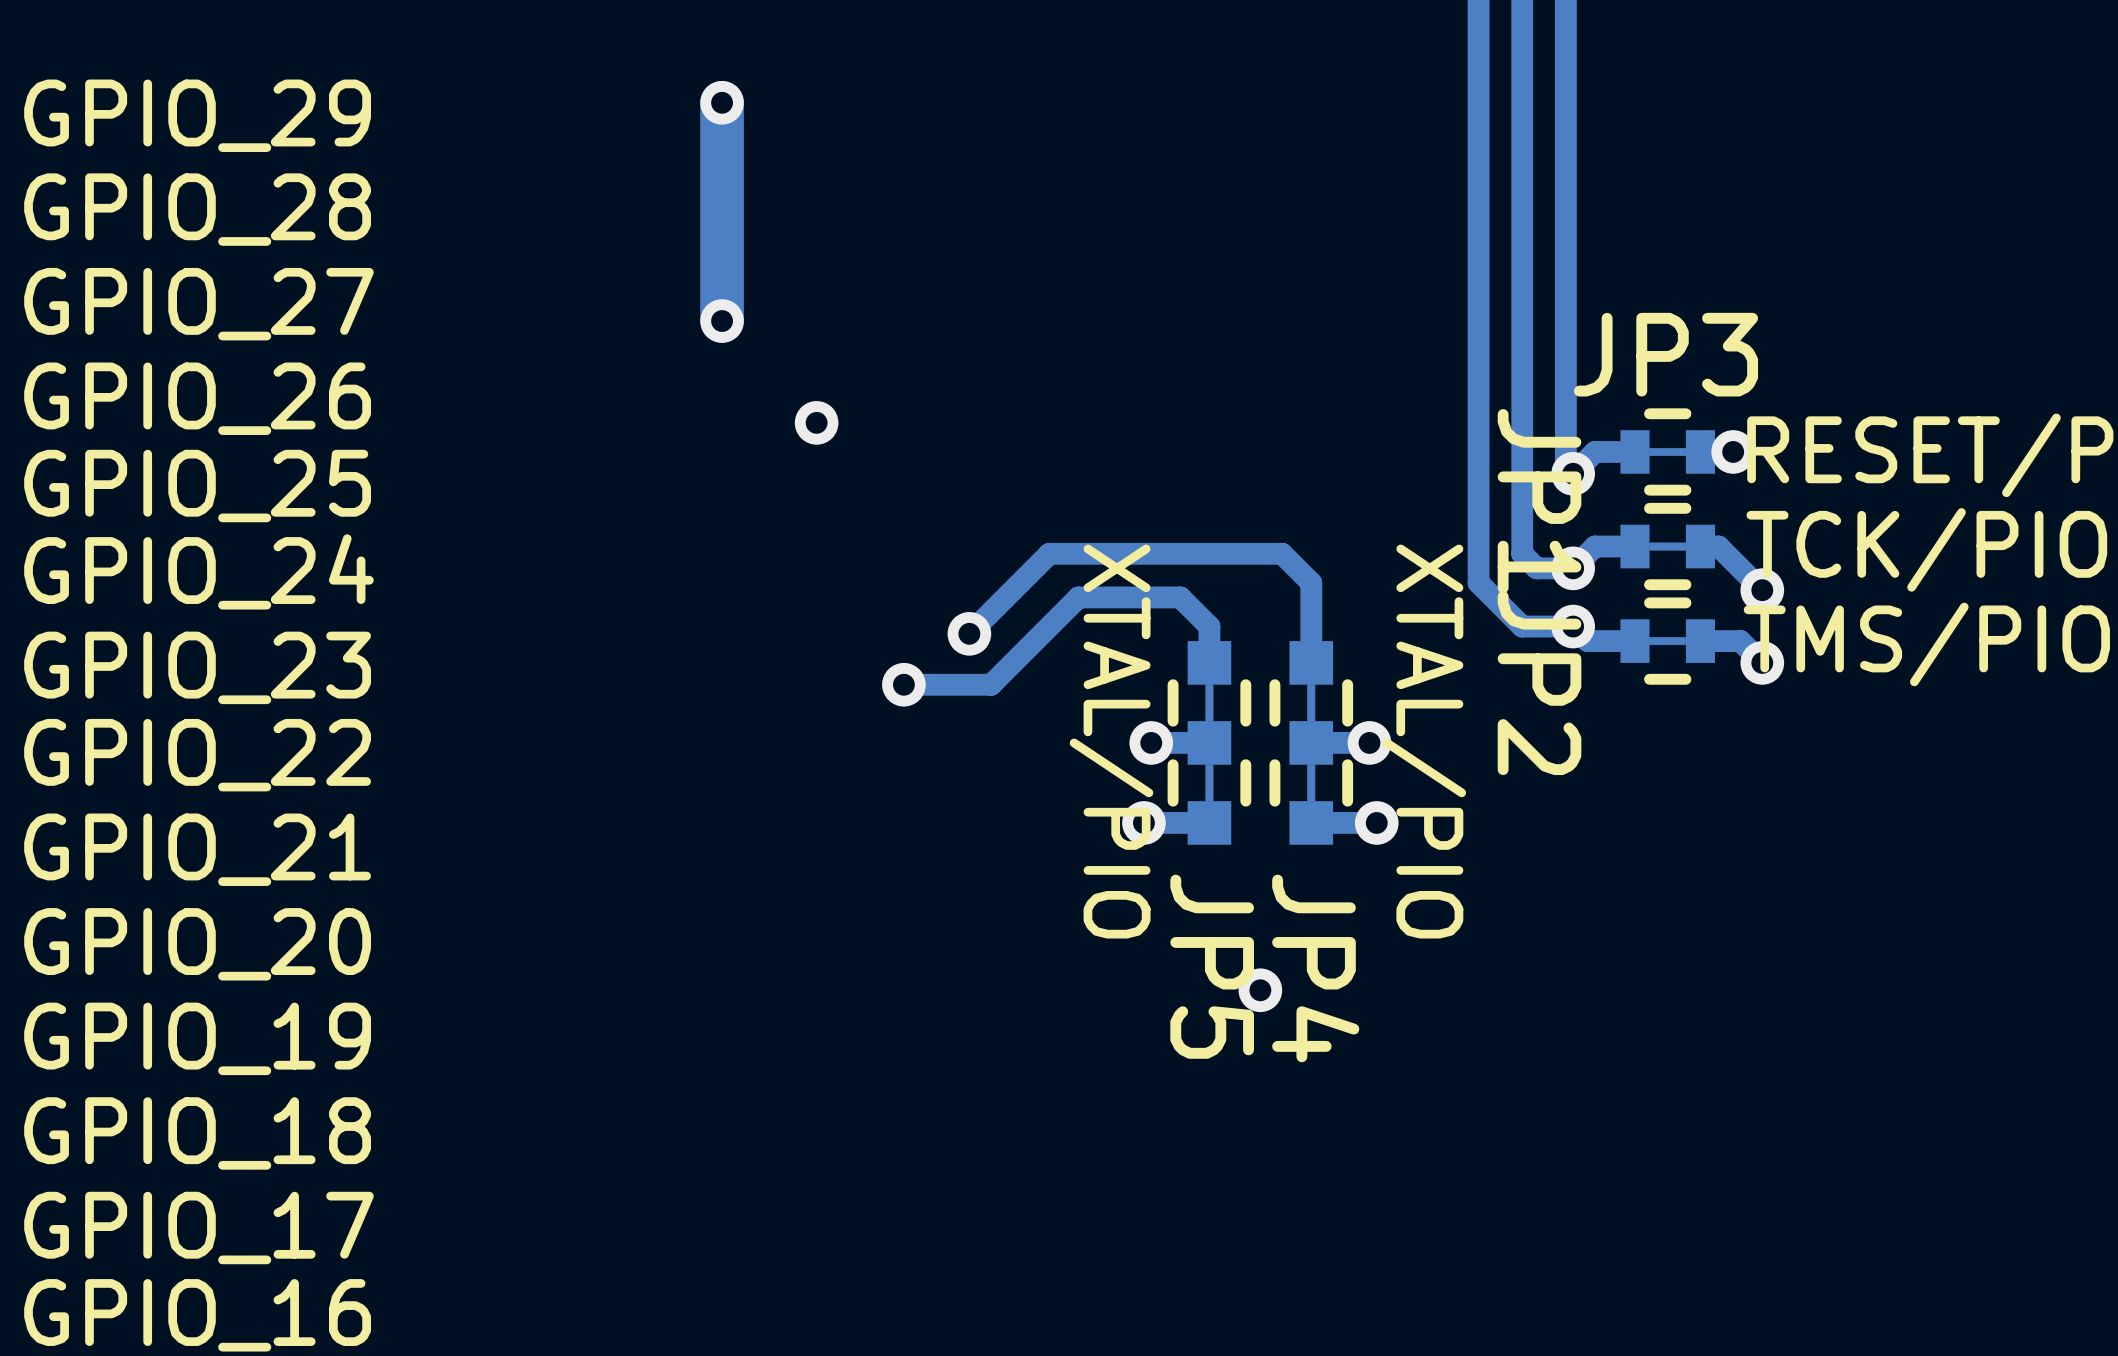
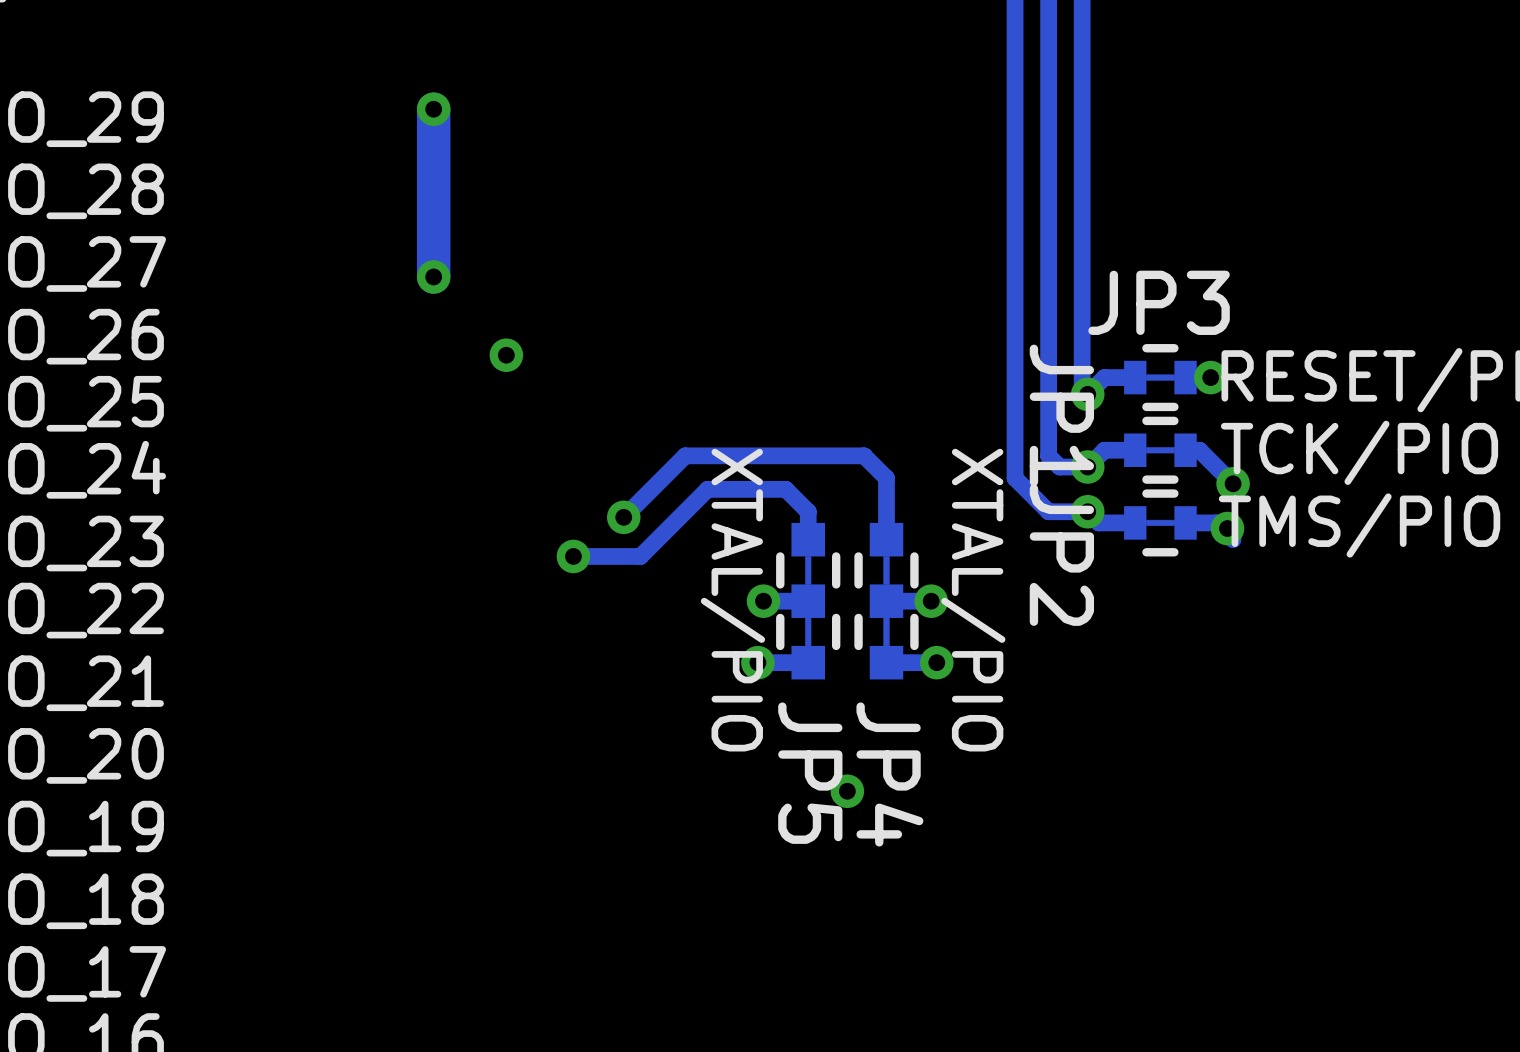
via position: (1762, 662) -> (1227, 528)

